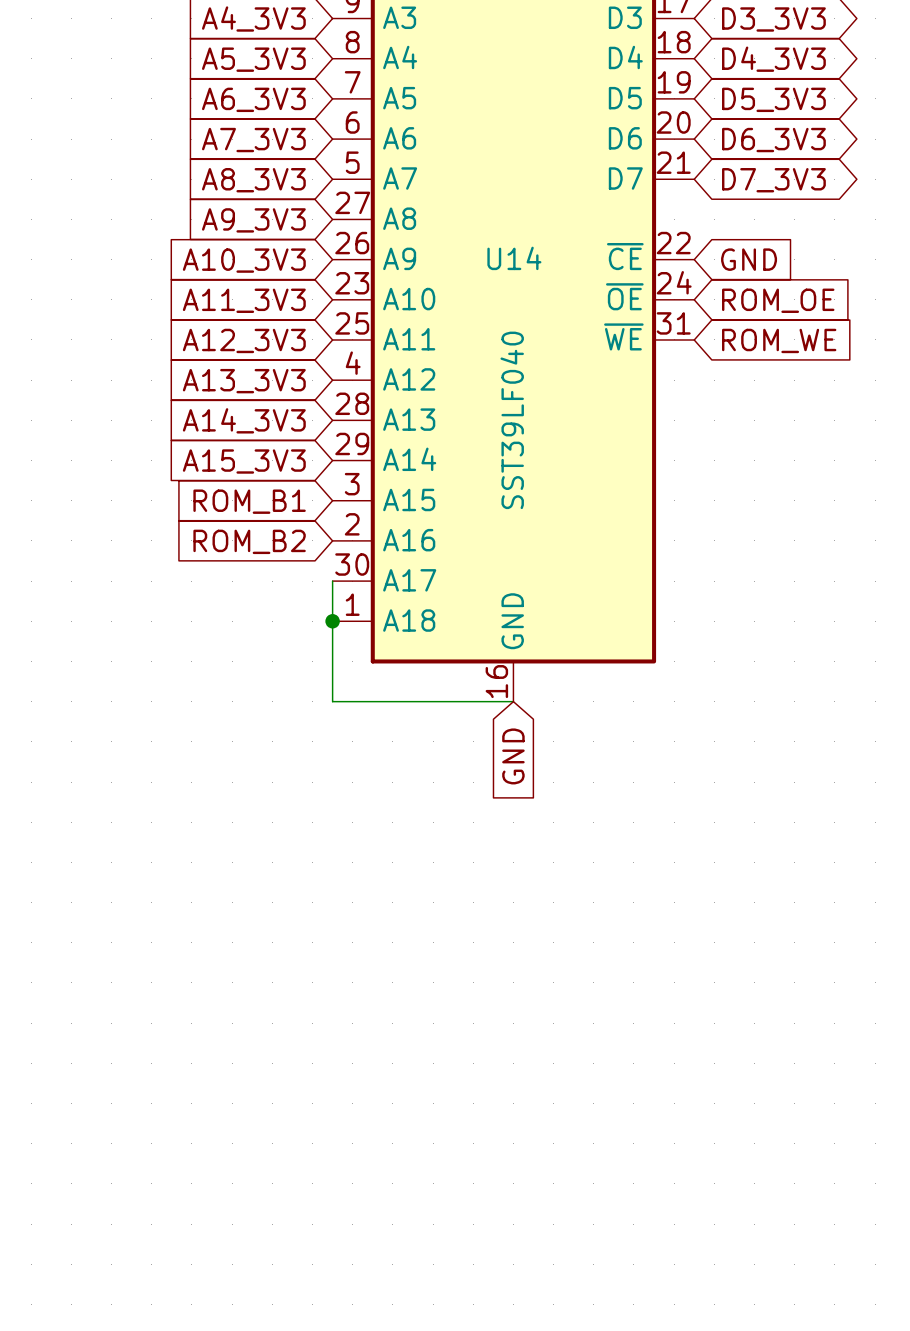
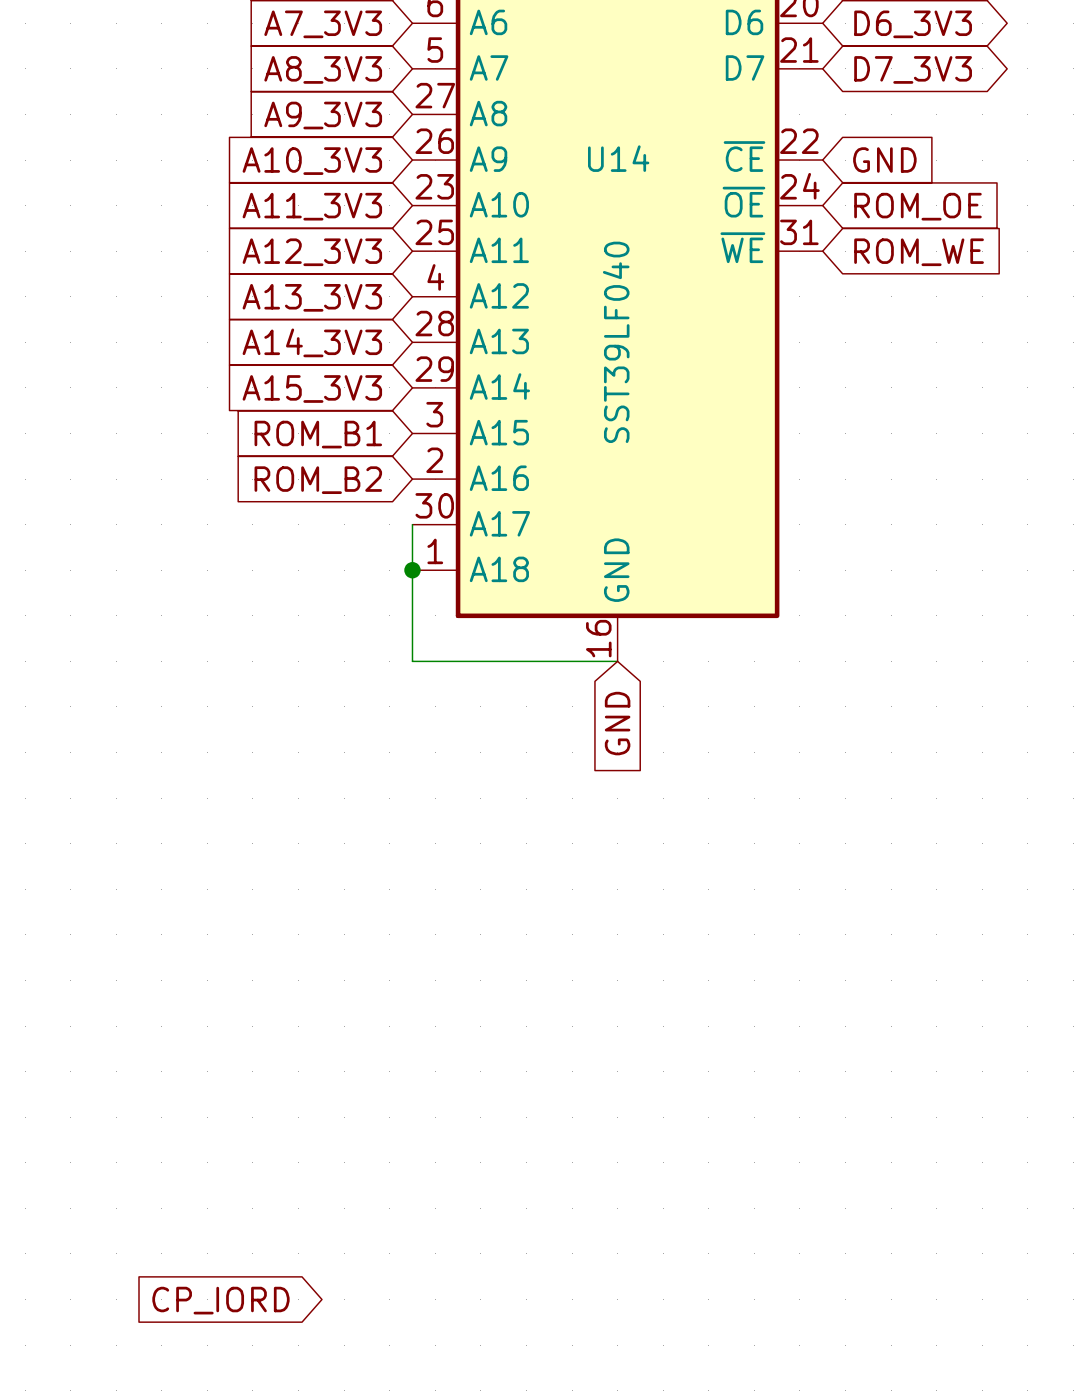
global label: none -> CP_IORD (220, 1300)

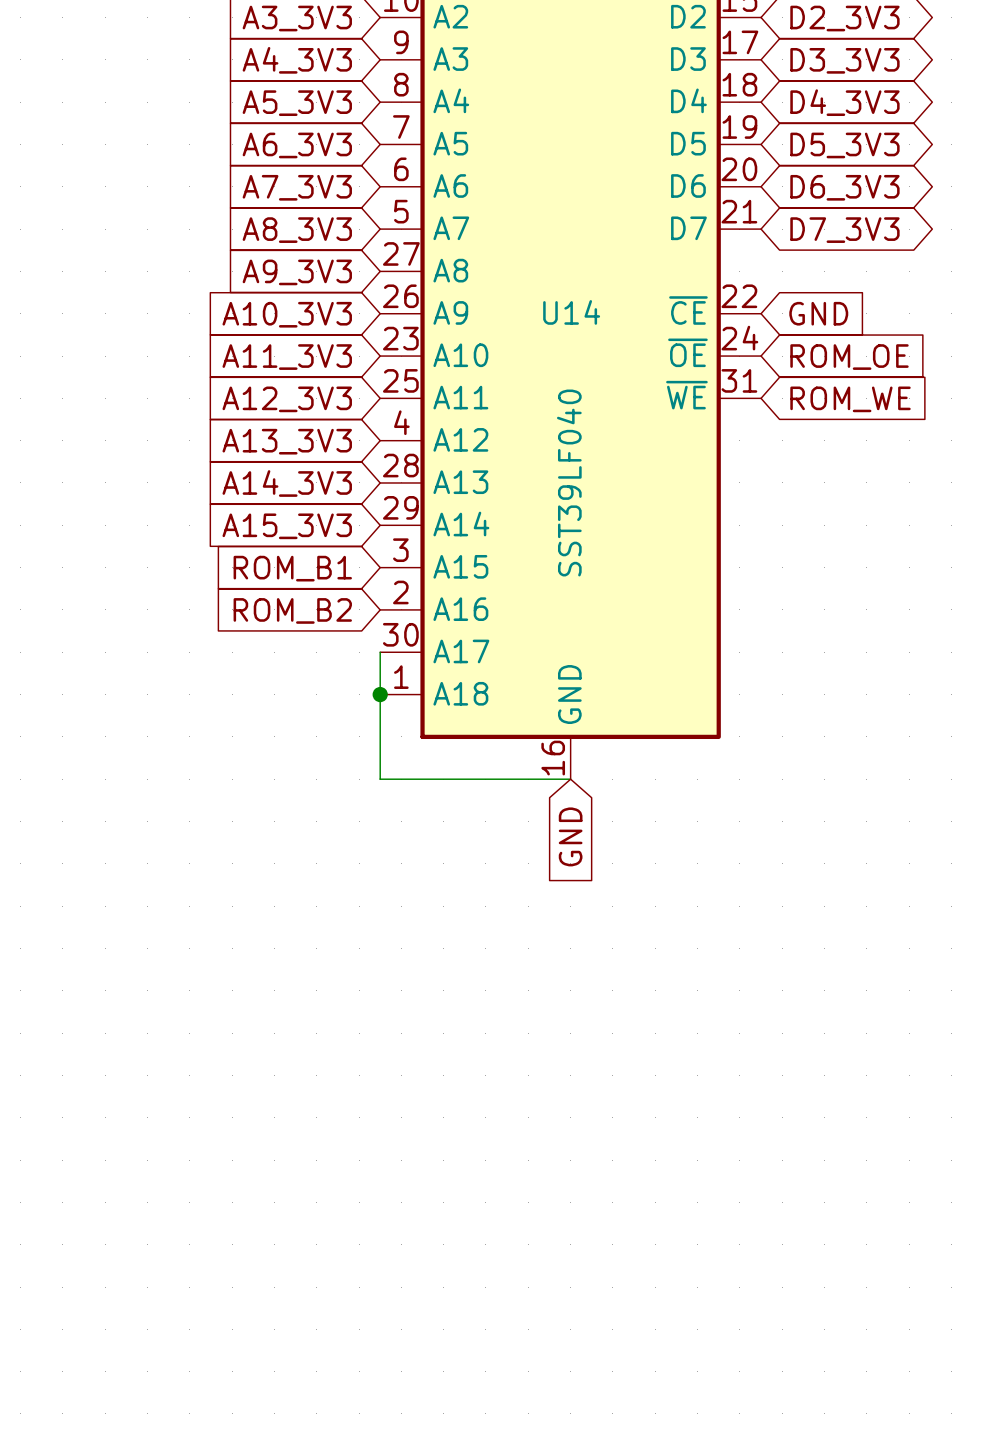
global label: CP_IORD (220, 1300) -> none

